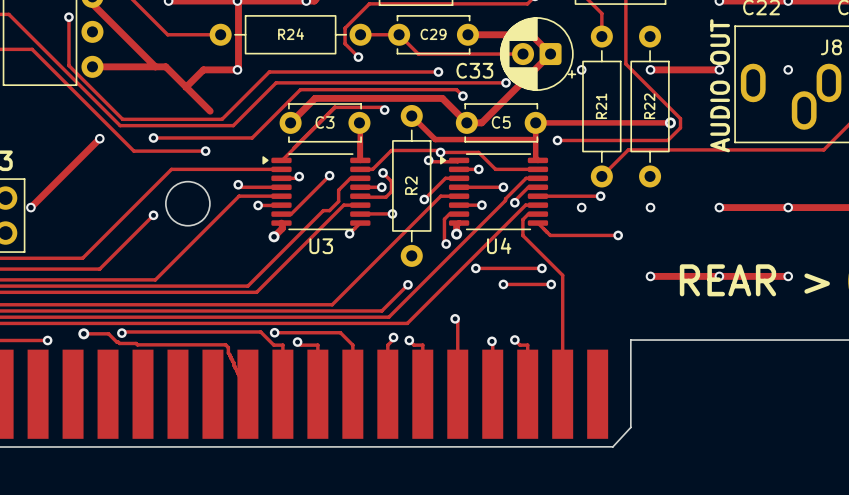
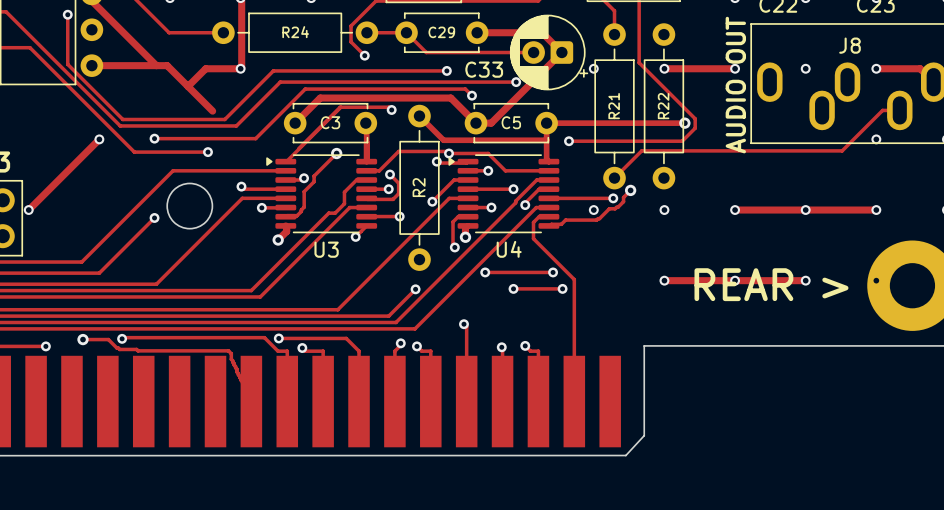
track: none -> (336, 153) (314, 176) (314, 181) (304, 191) (304, 207) (301, 211) (297, 215) (285, 216)
via: none -> (336, 153)
track: (329, 175) (291, 214) -> none
via: (329, 175) -> none
via: none -> (630, 190)
track: (537, 223) (550, 235) (618, 235) -> (548, 225) (561, 224) (565, 220) (596, 220) (609, 208) (617, 207) (630, 190)
via: (618, 235) -> none

